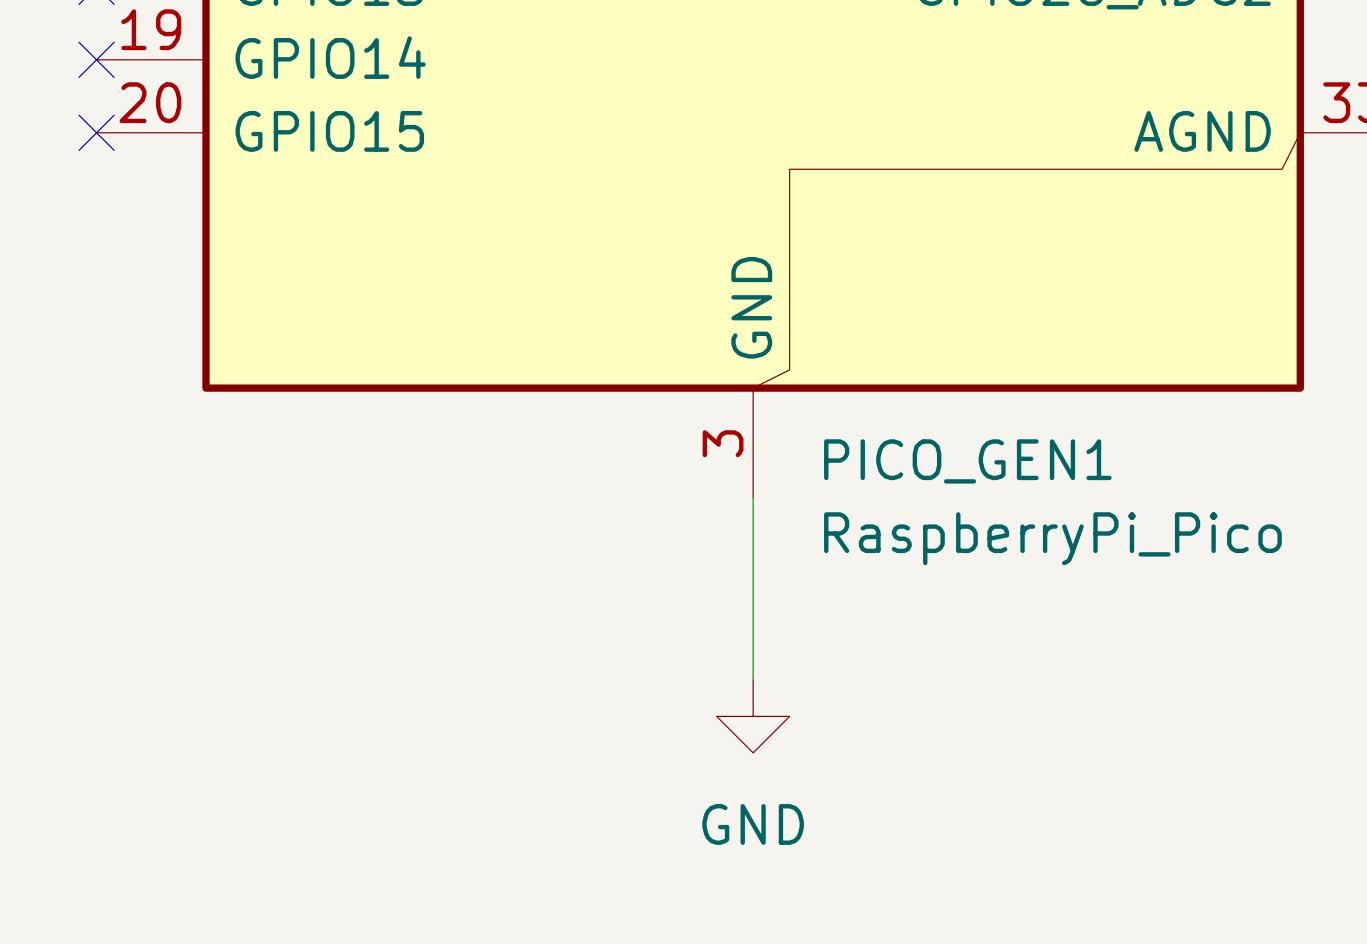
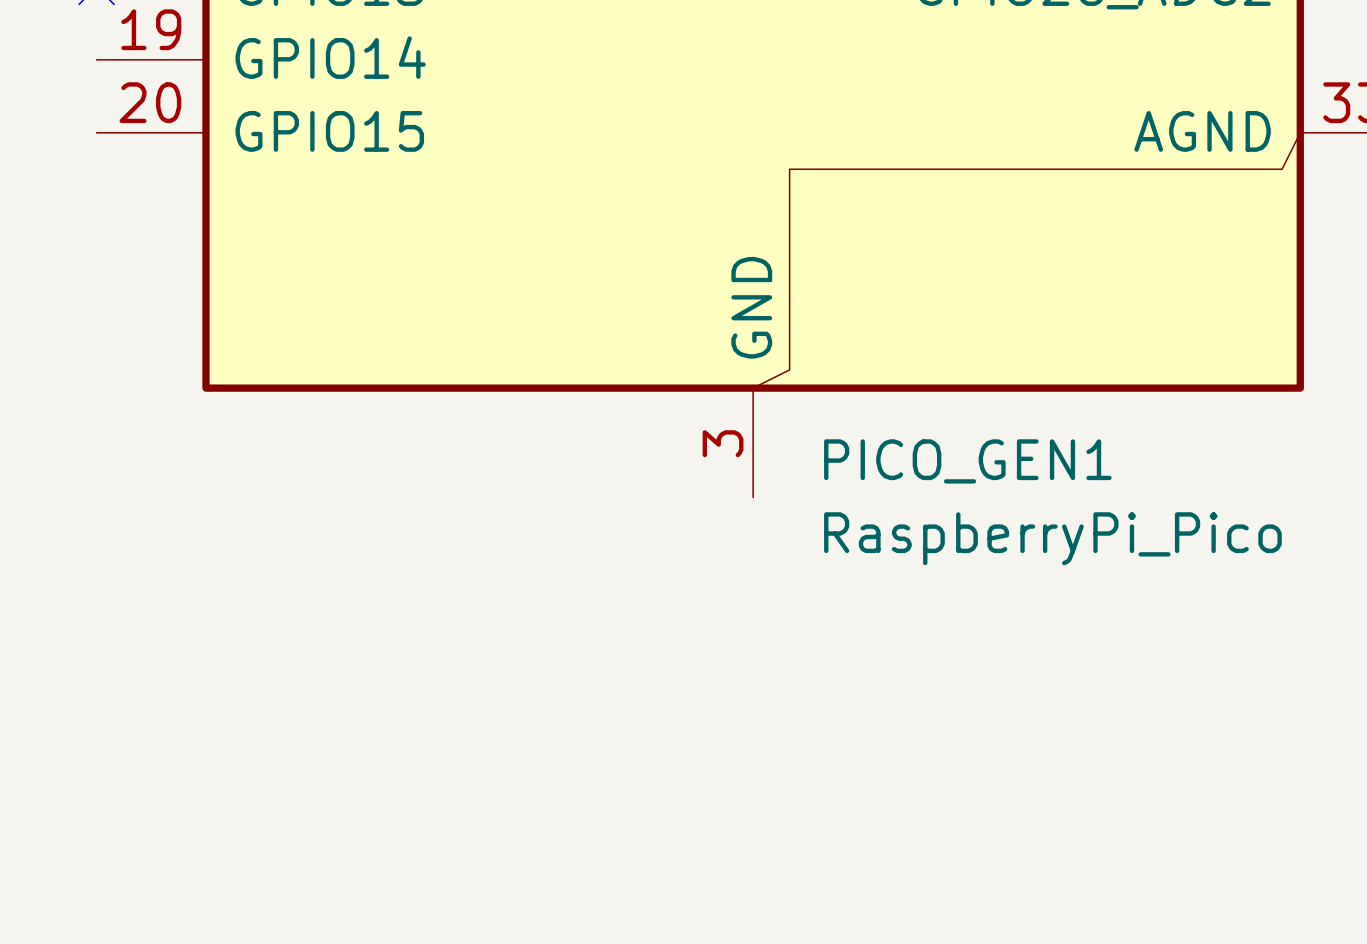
no-connect mark: (96, 59) -> none
no-connect mark: (96, 132) -> none
wire: (753, 497) (753, 679) -> none
power symbol: GND (753, 716) -> none

